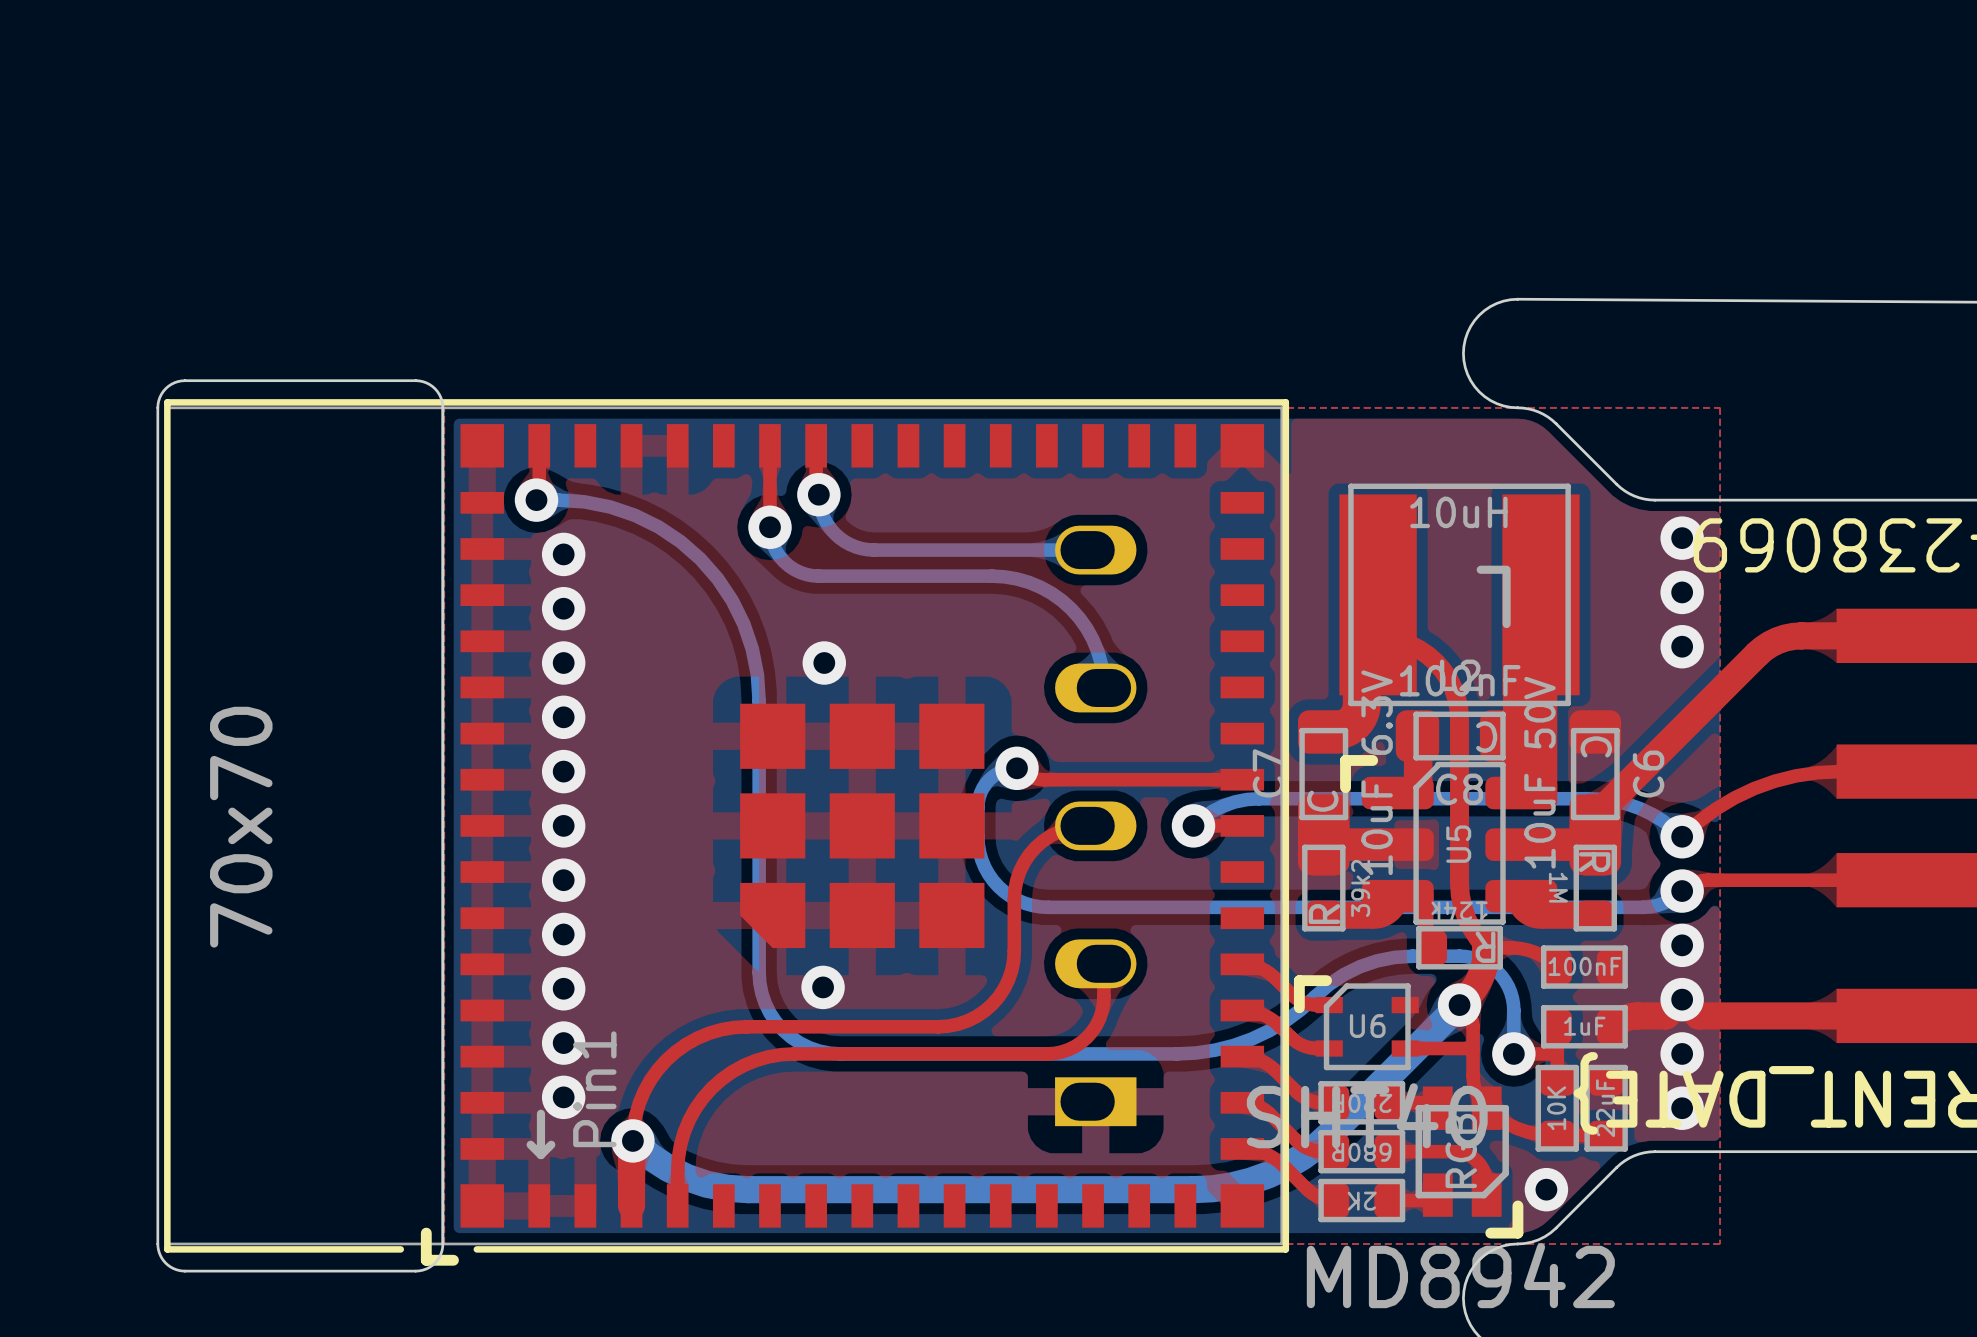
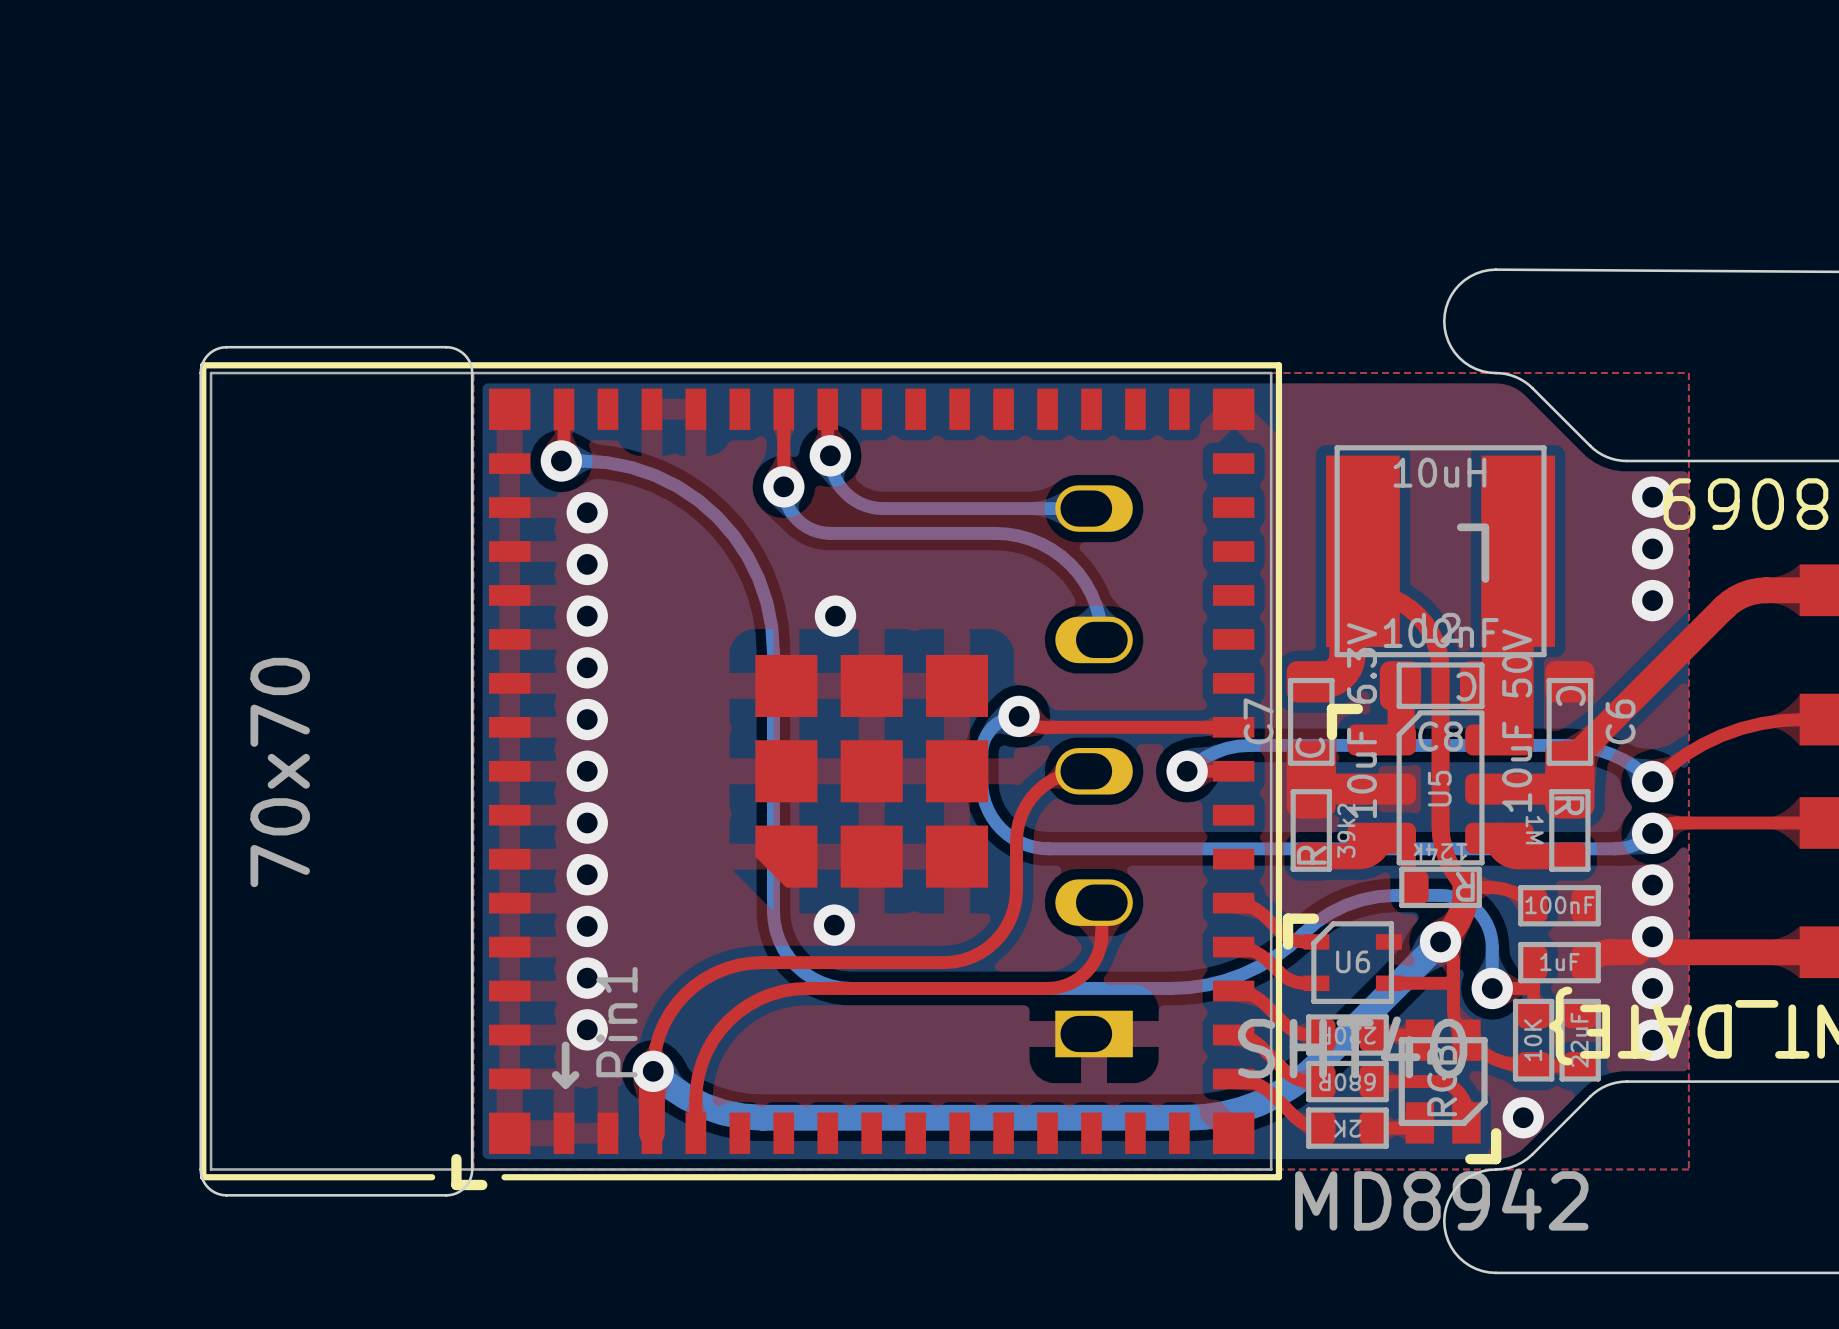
part footprint: [164, 399, 1290, 1266] -> [200, 362, 1283, 1191]

